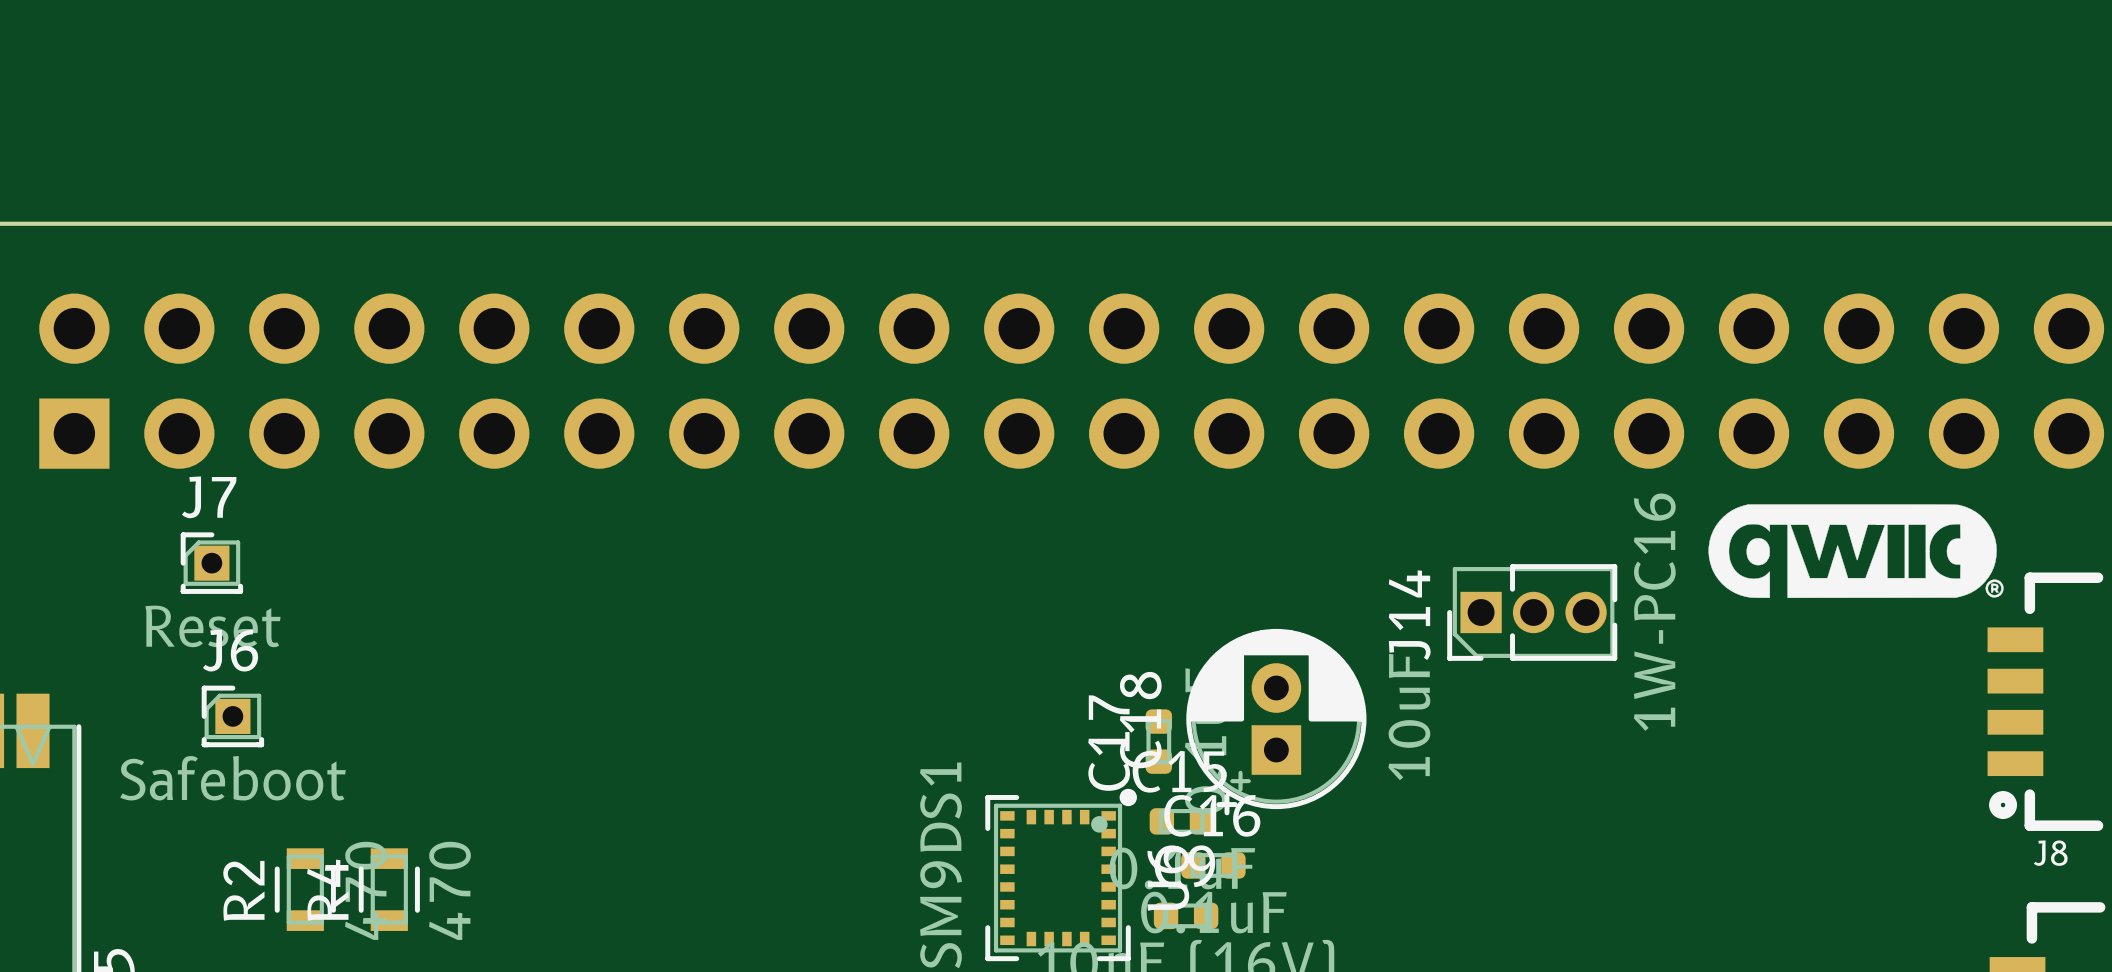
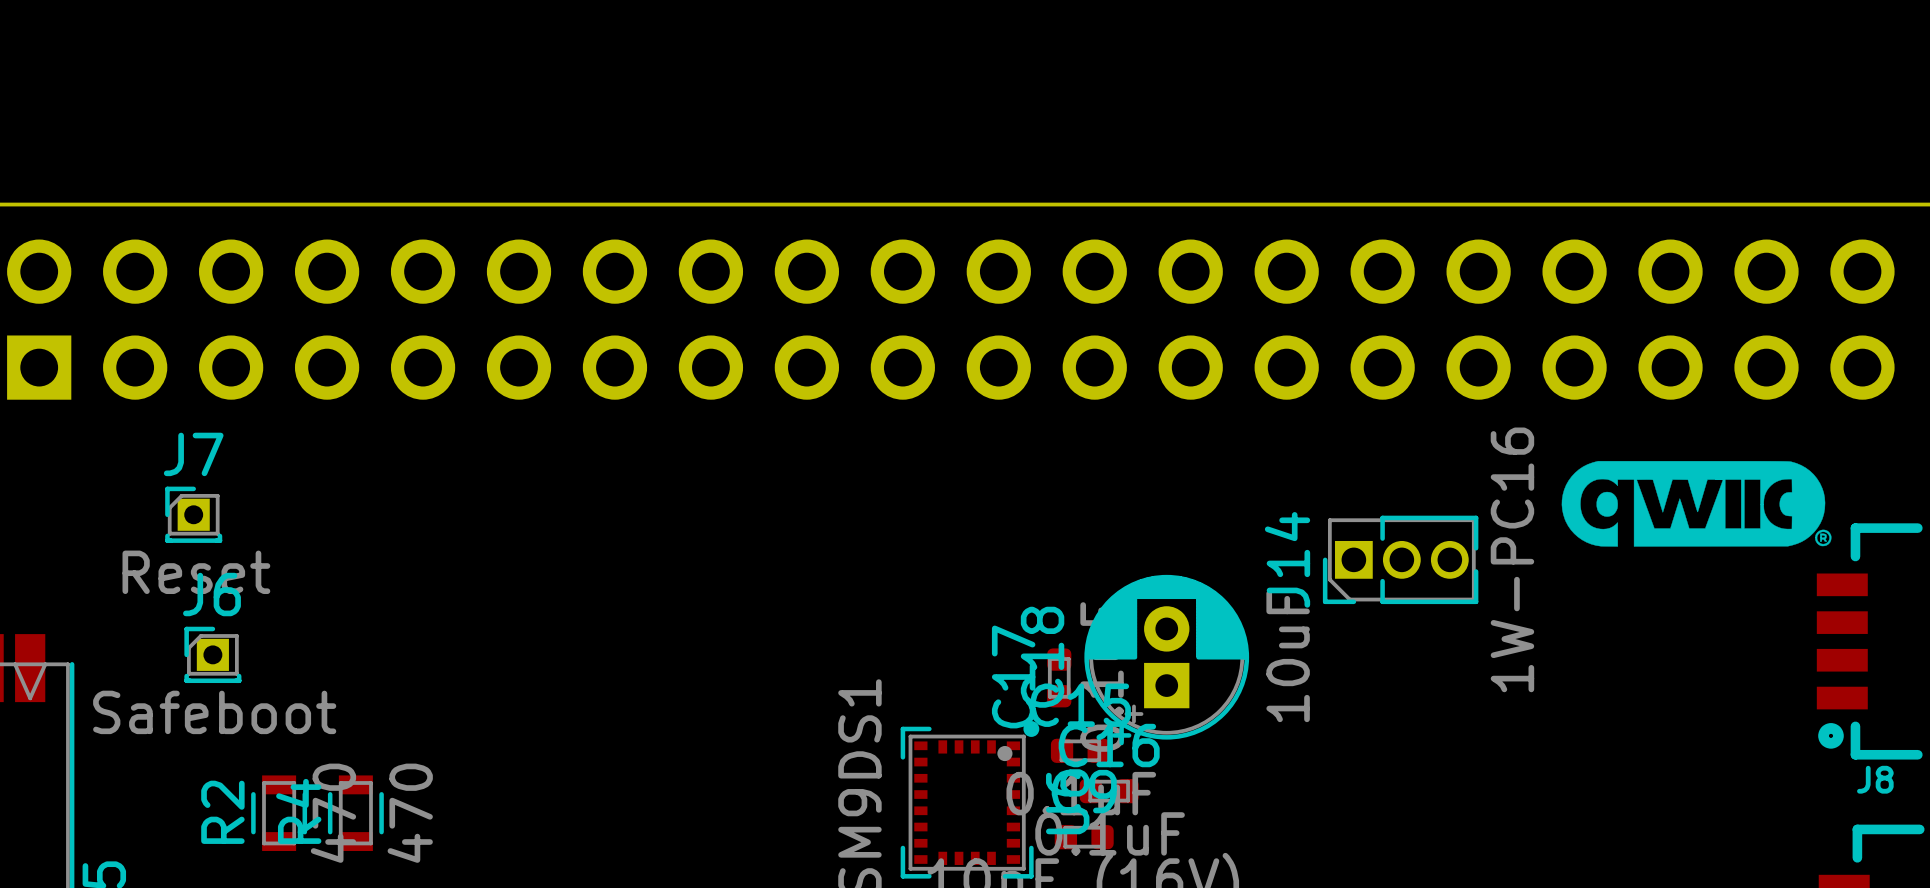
part position: (1071, 381) -> (950, 319)

